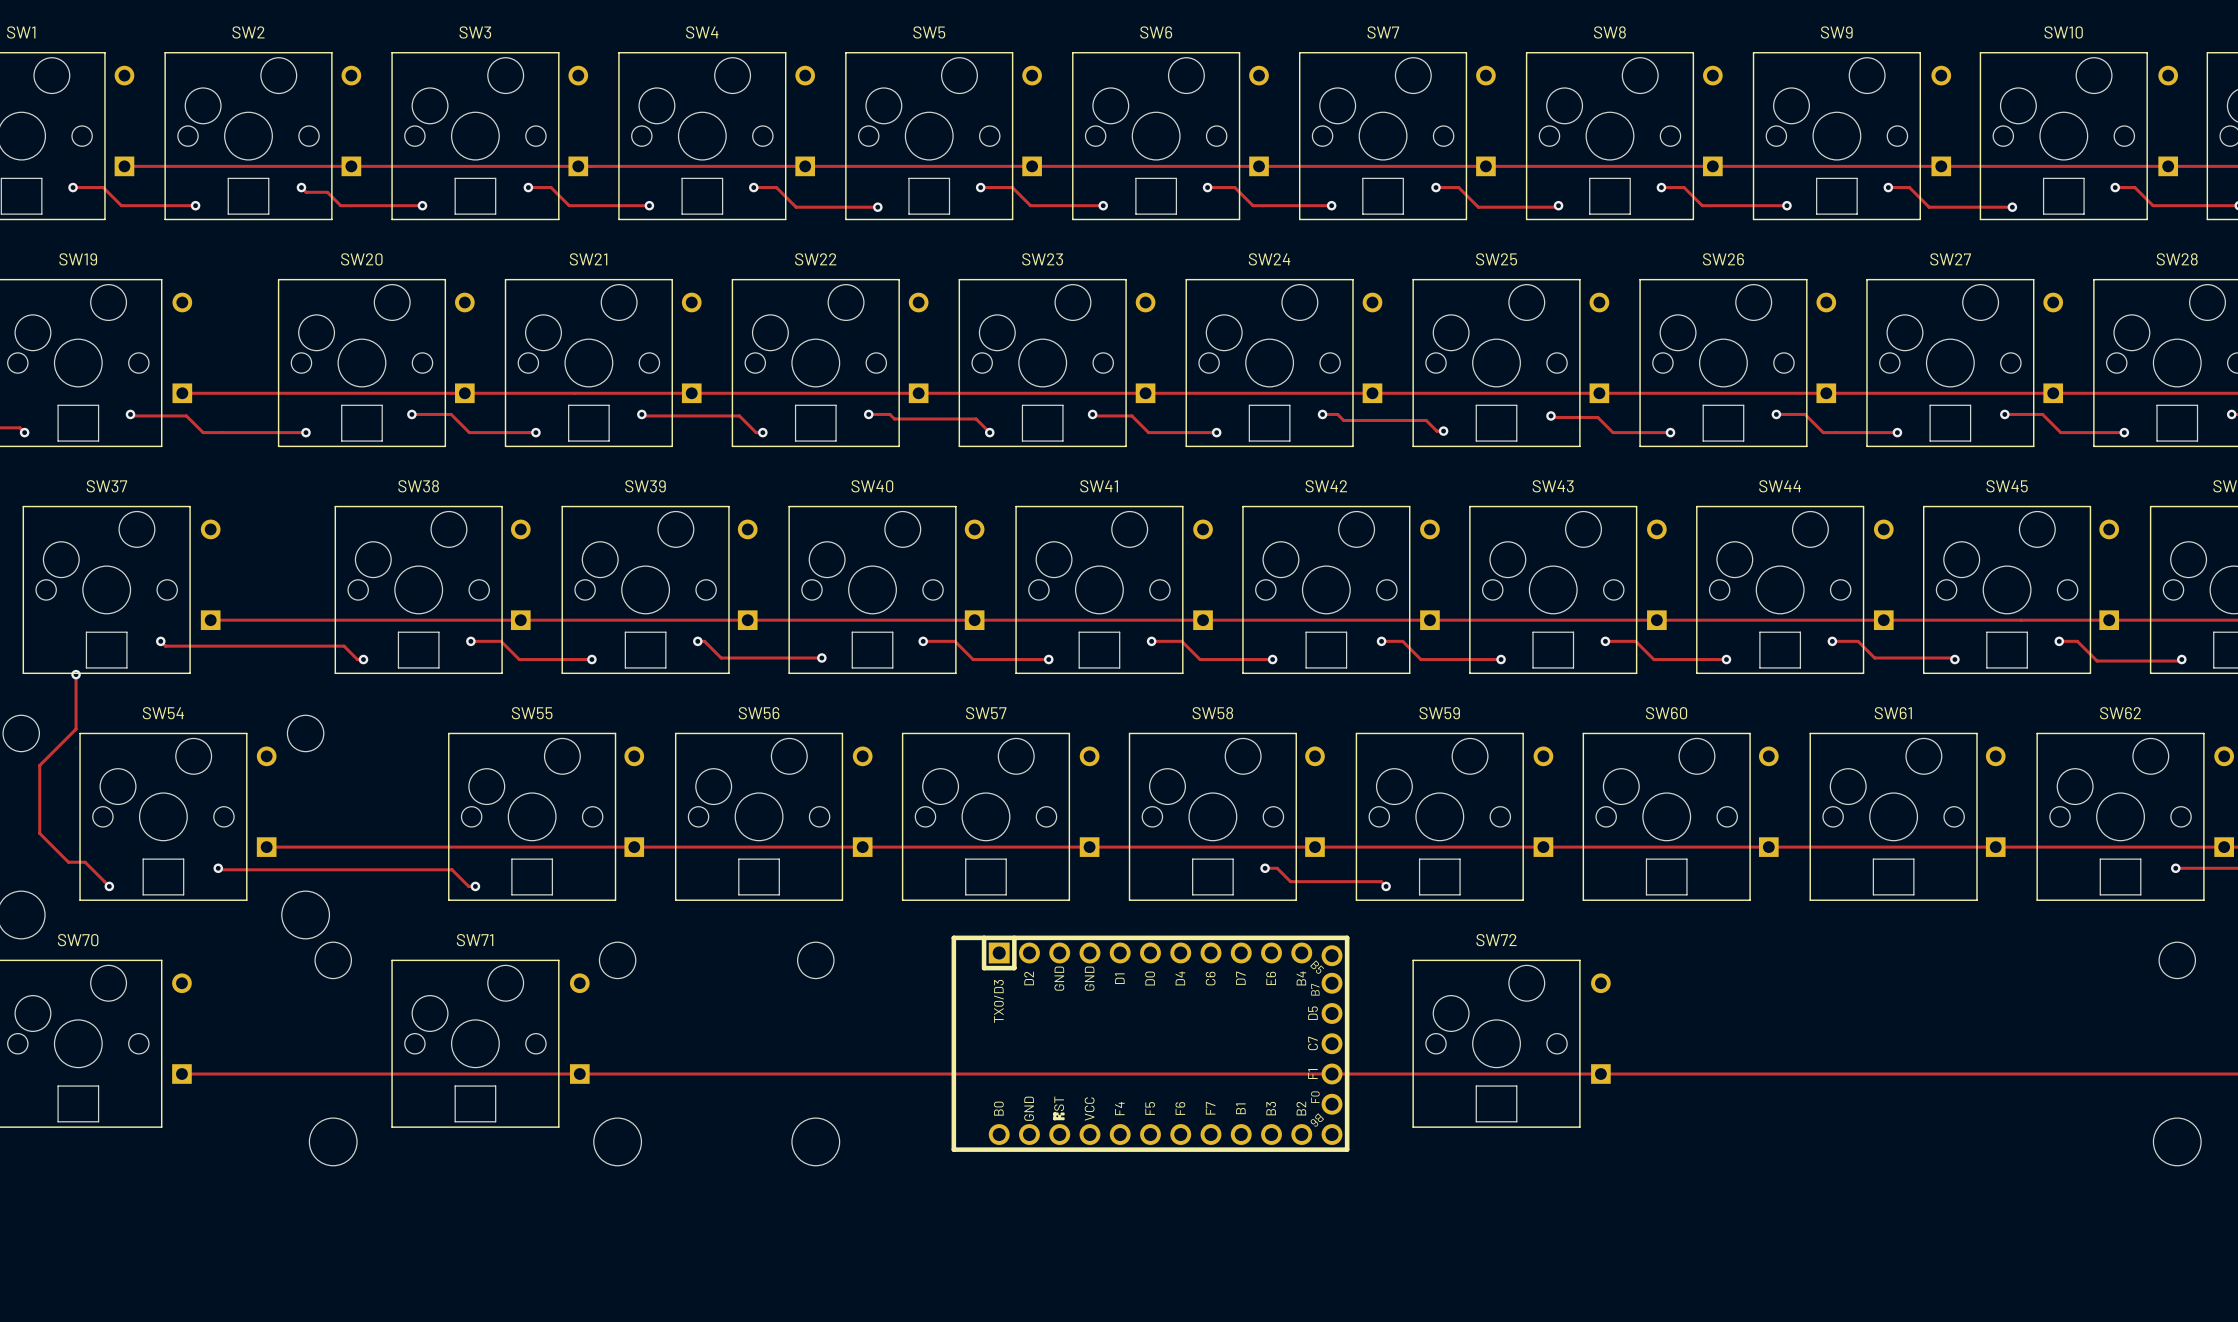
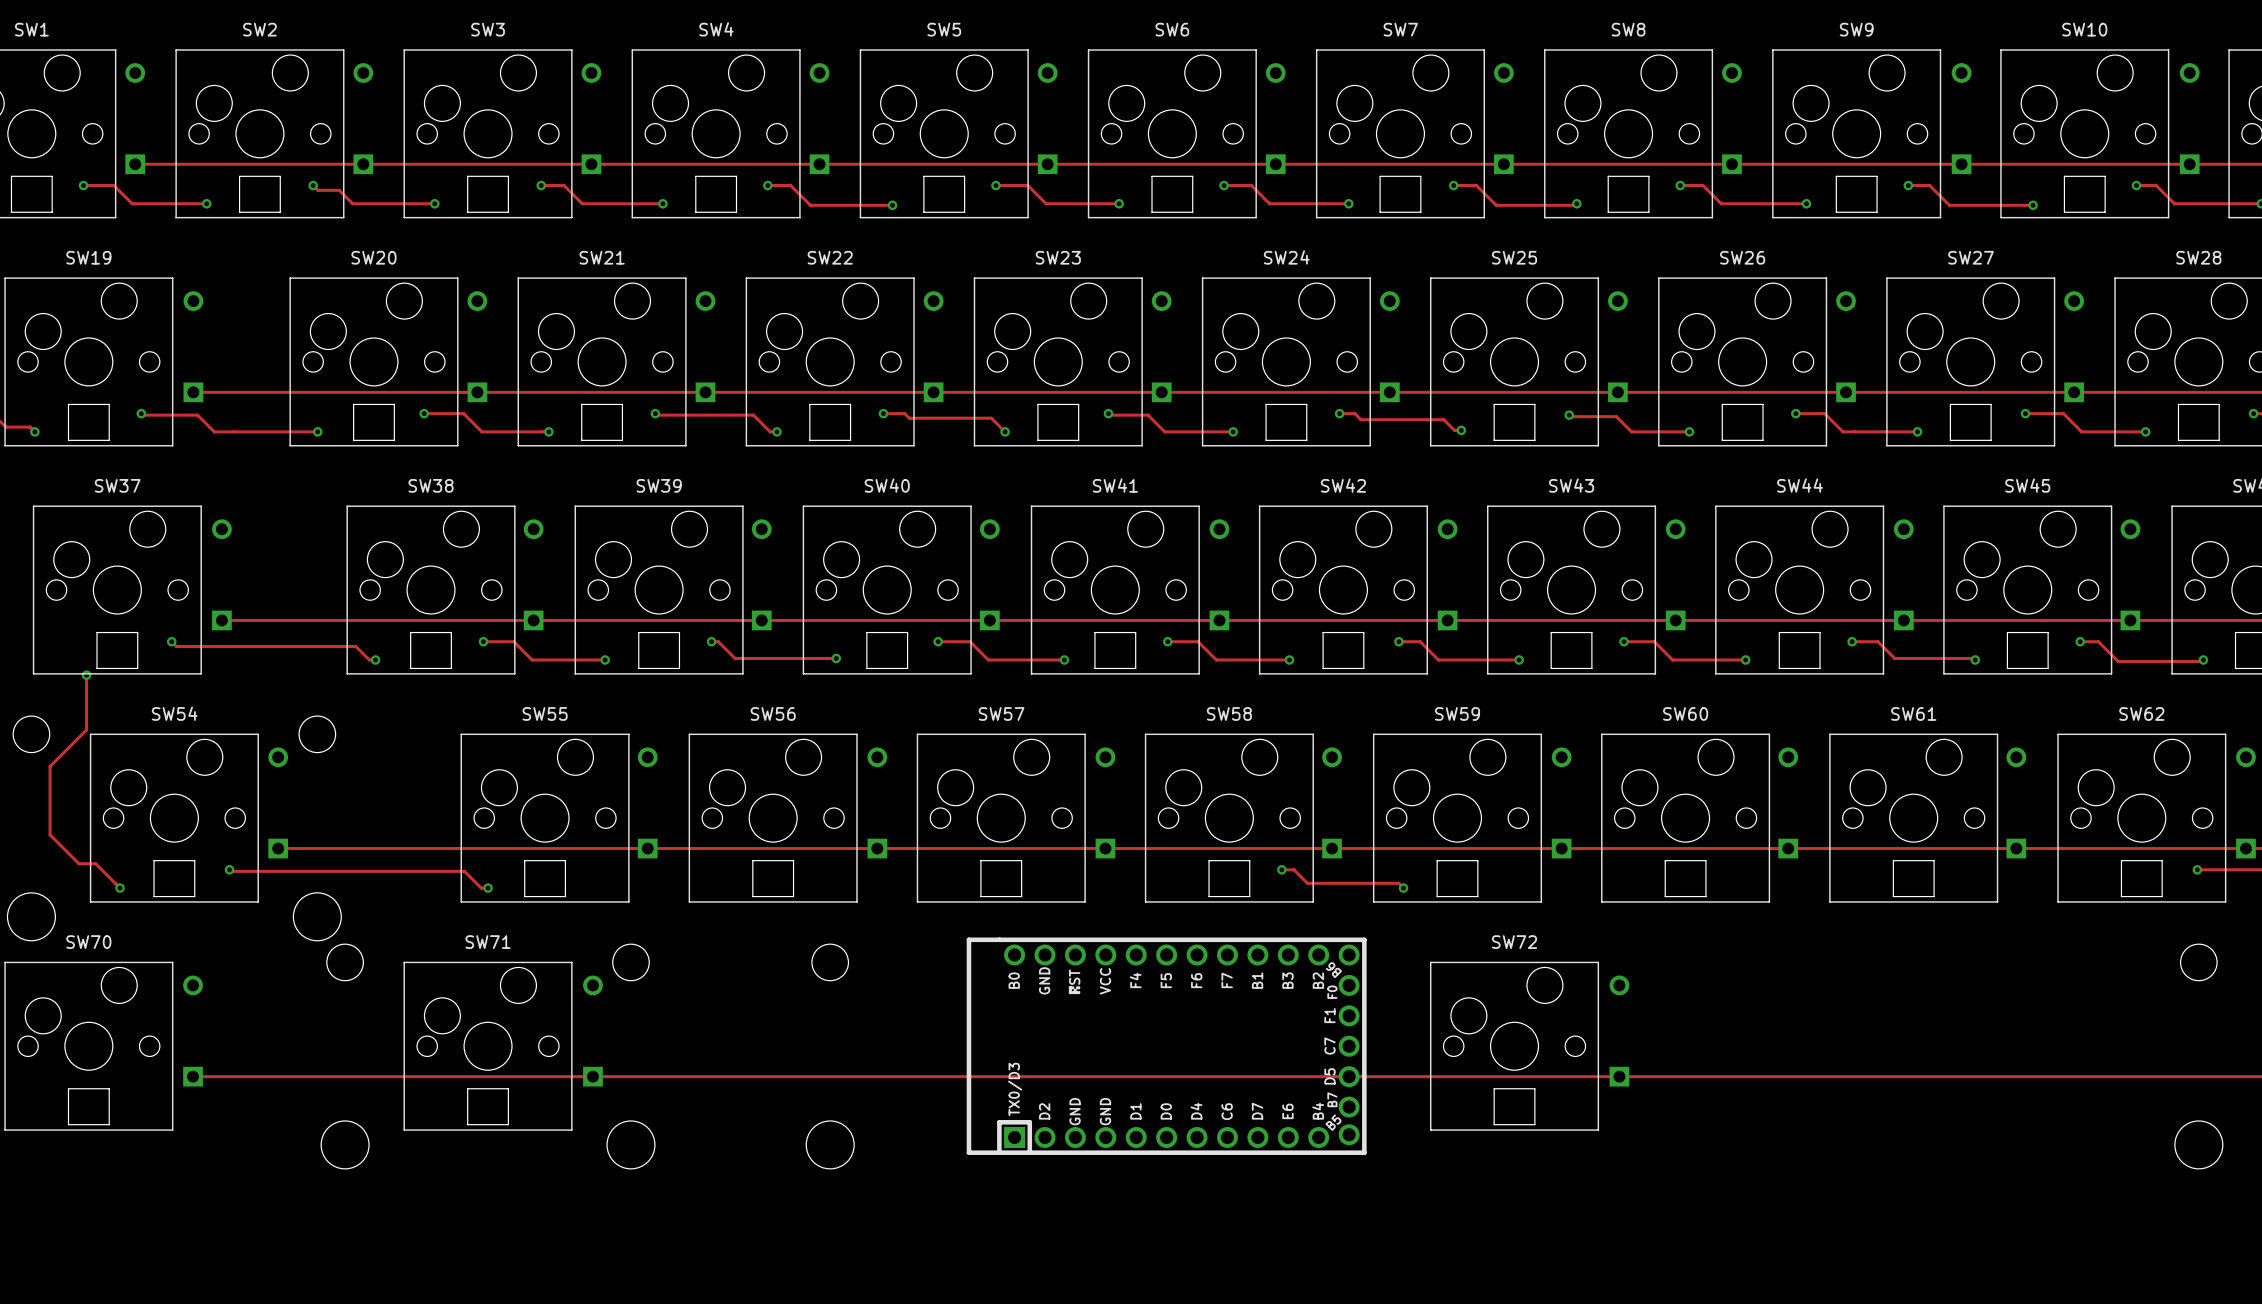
part side: bottom (1150, 1043) -> top (1166, 1046)

